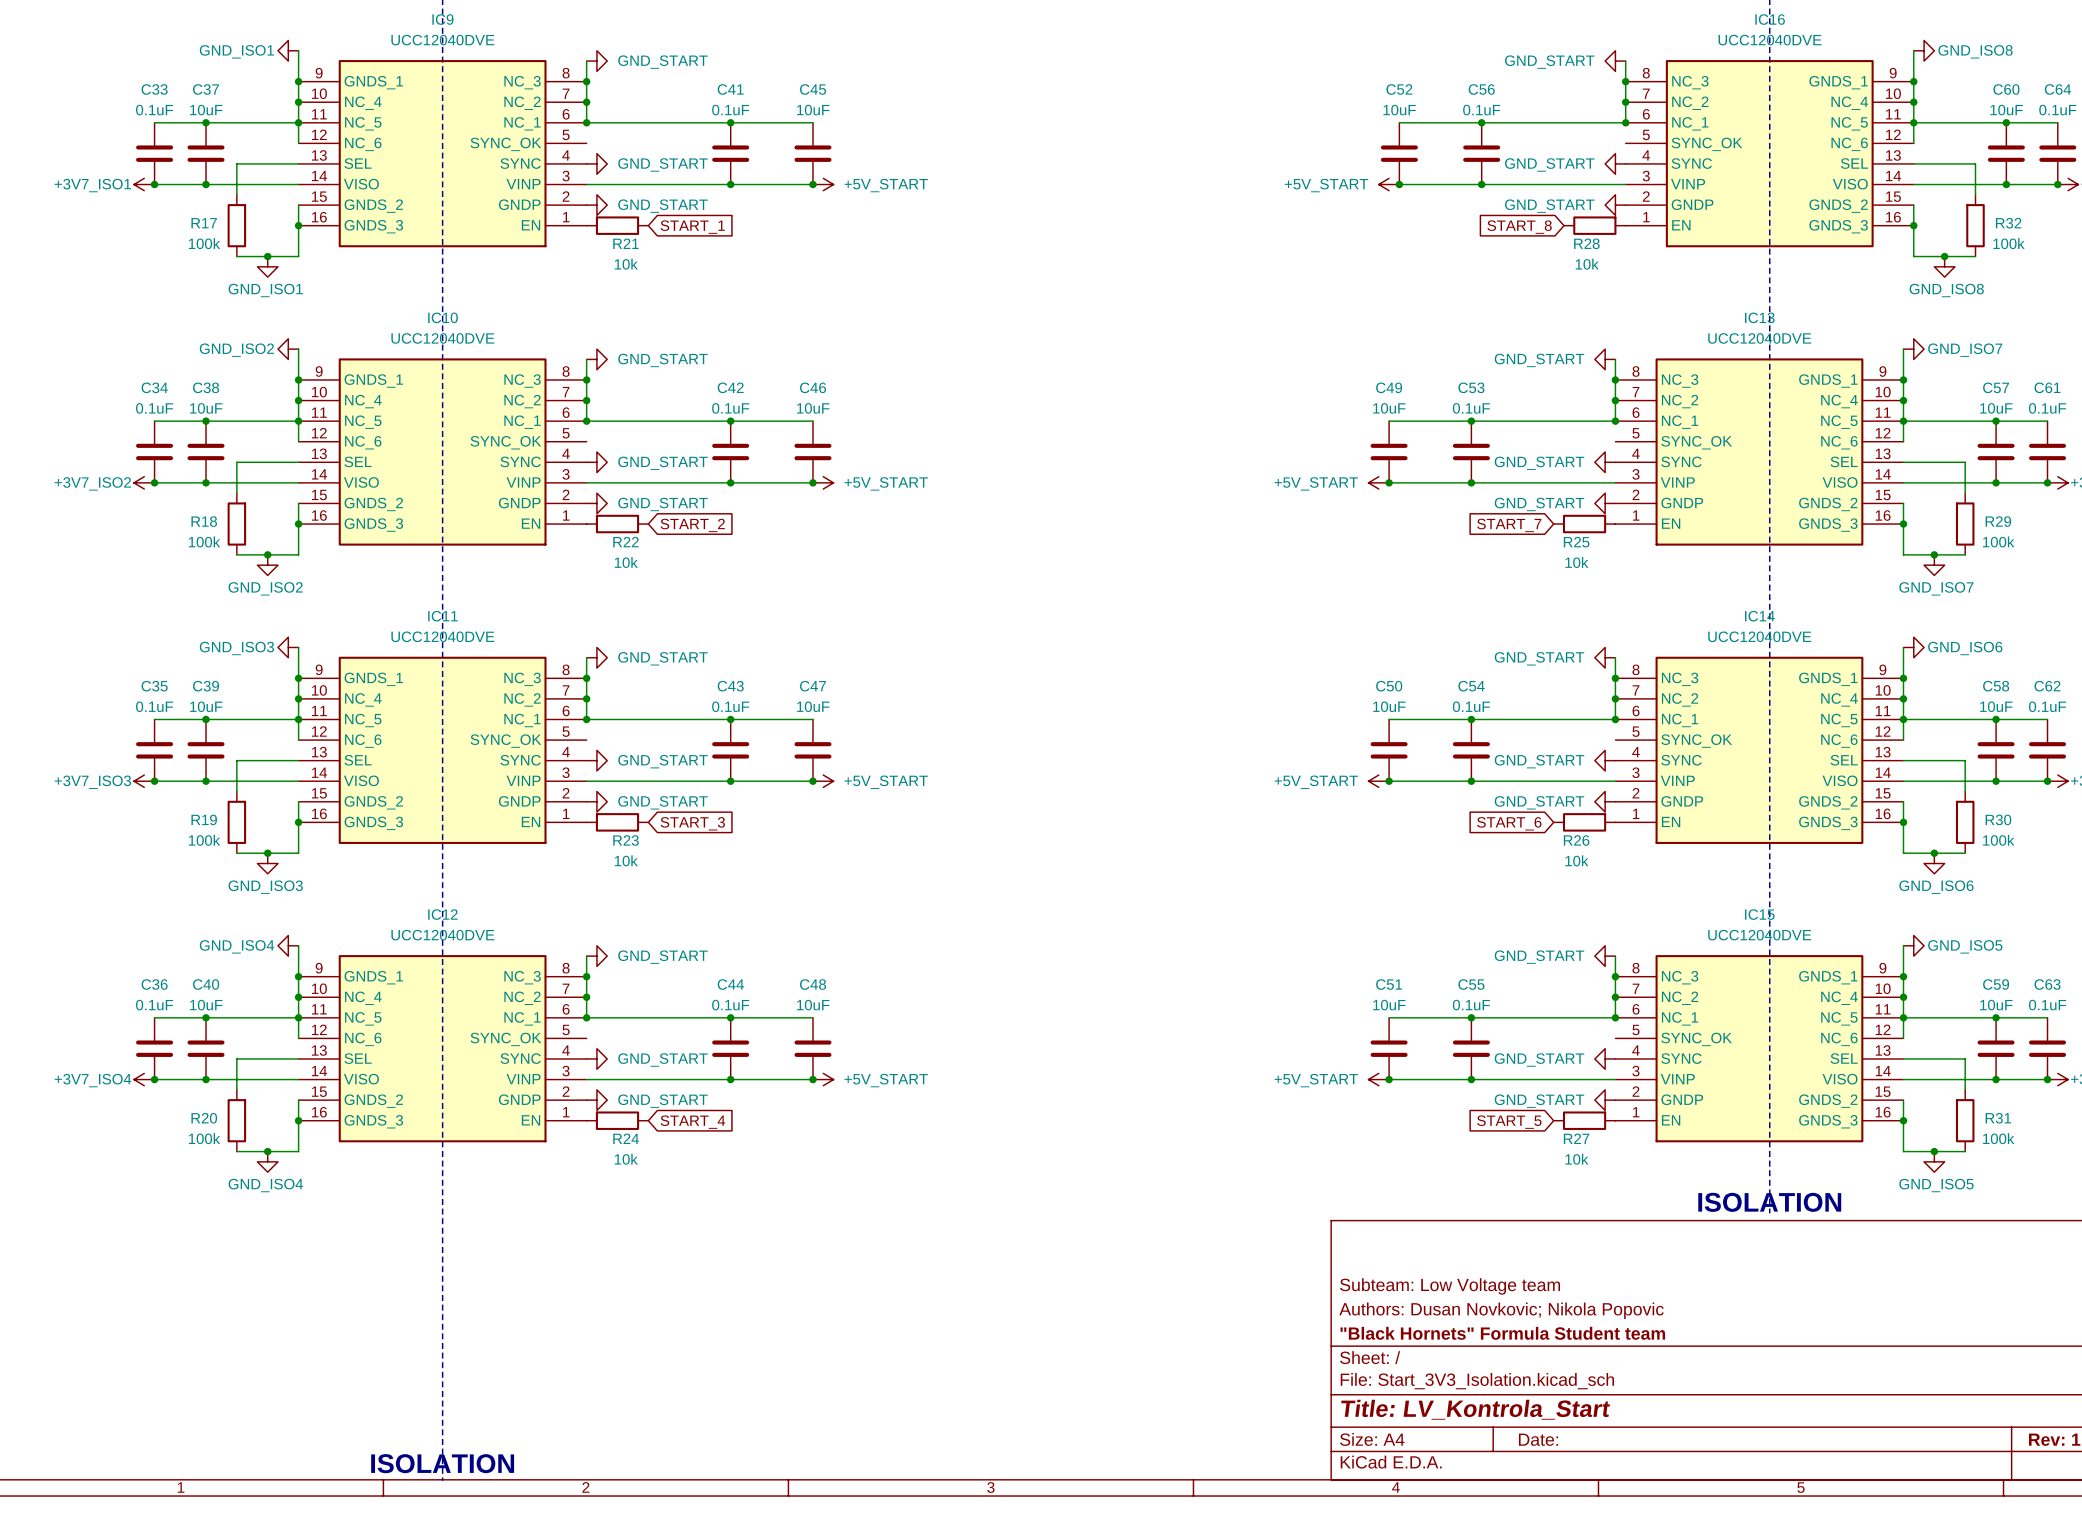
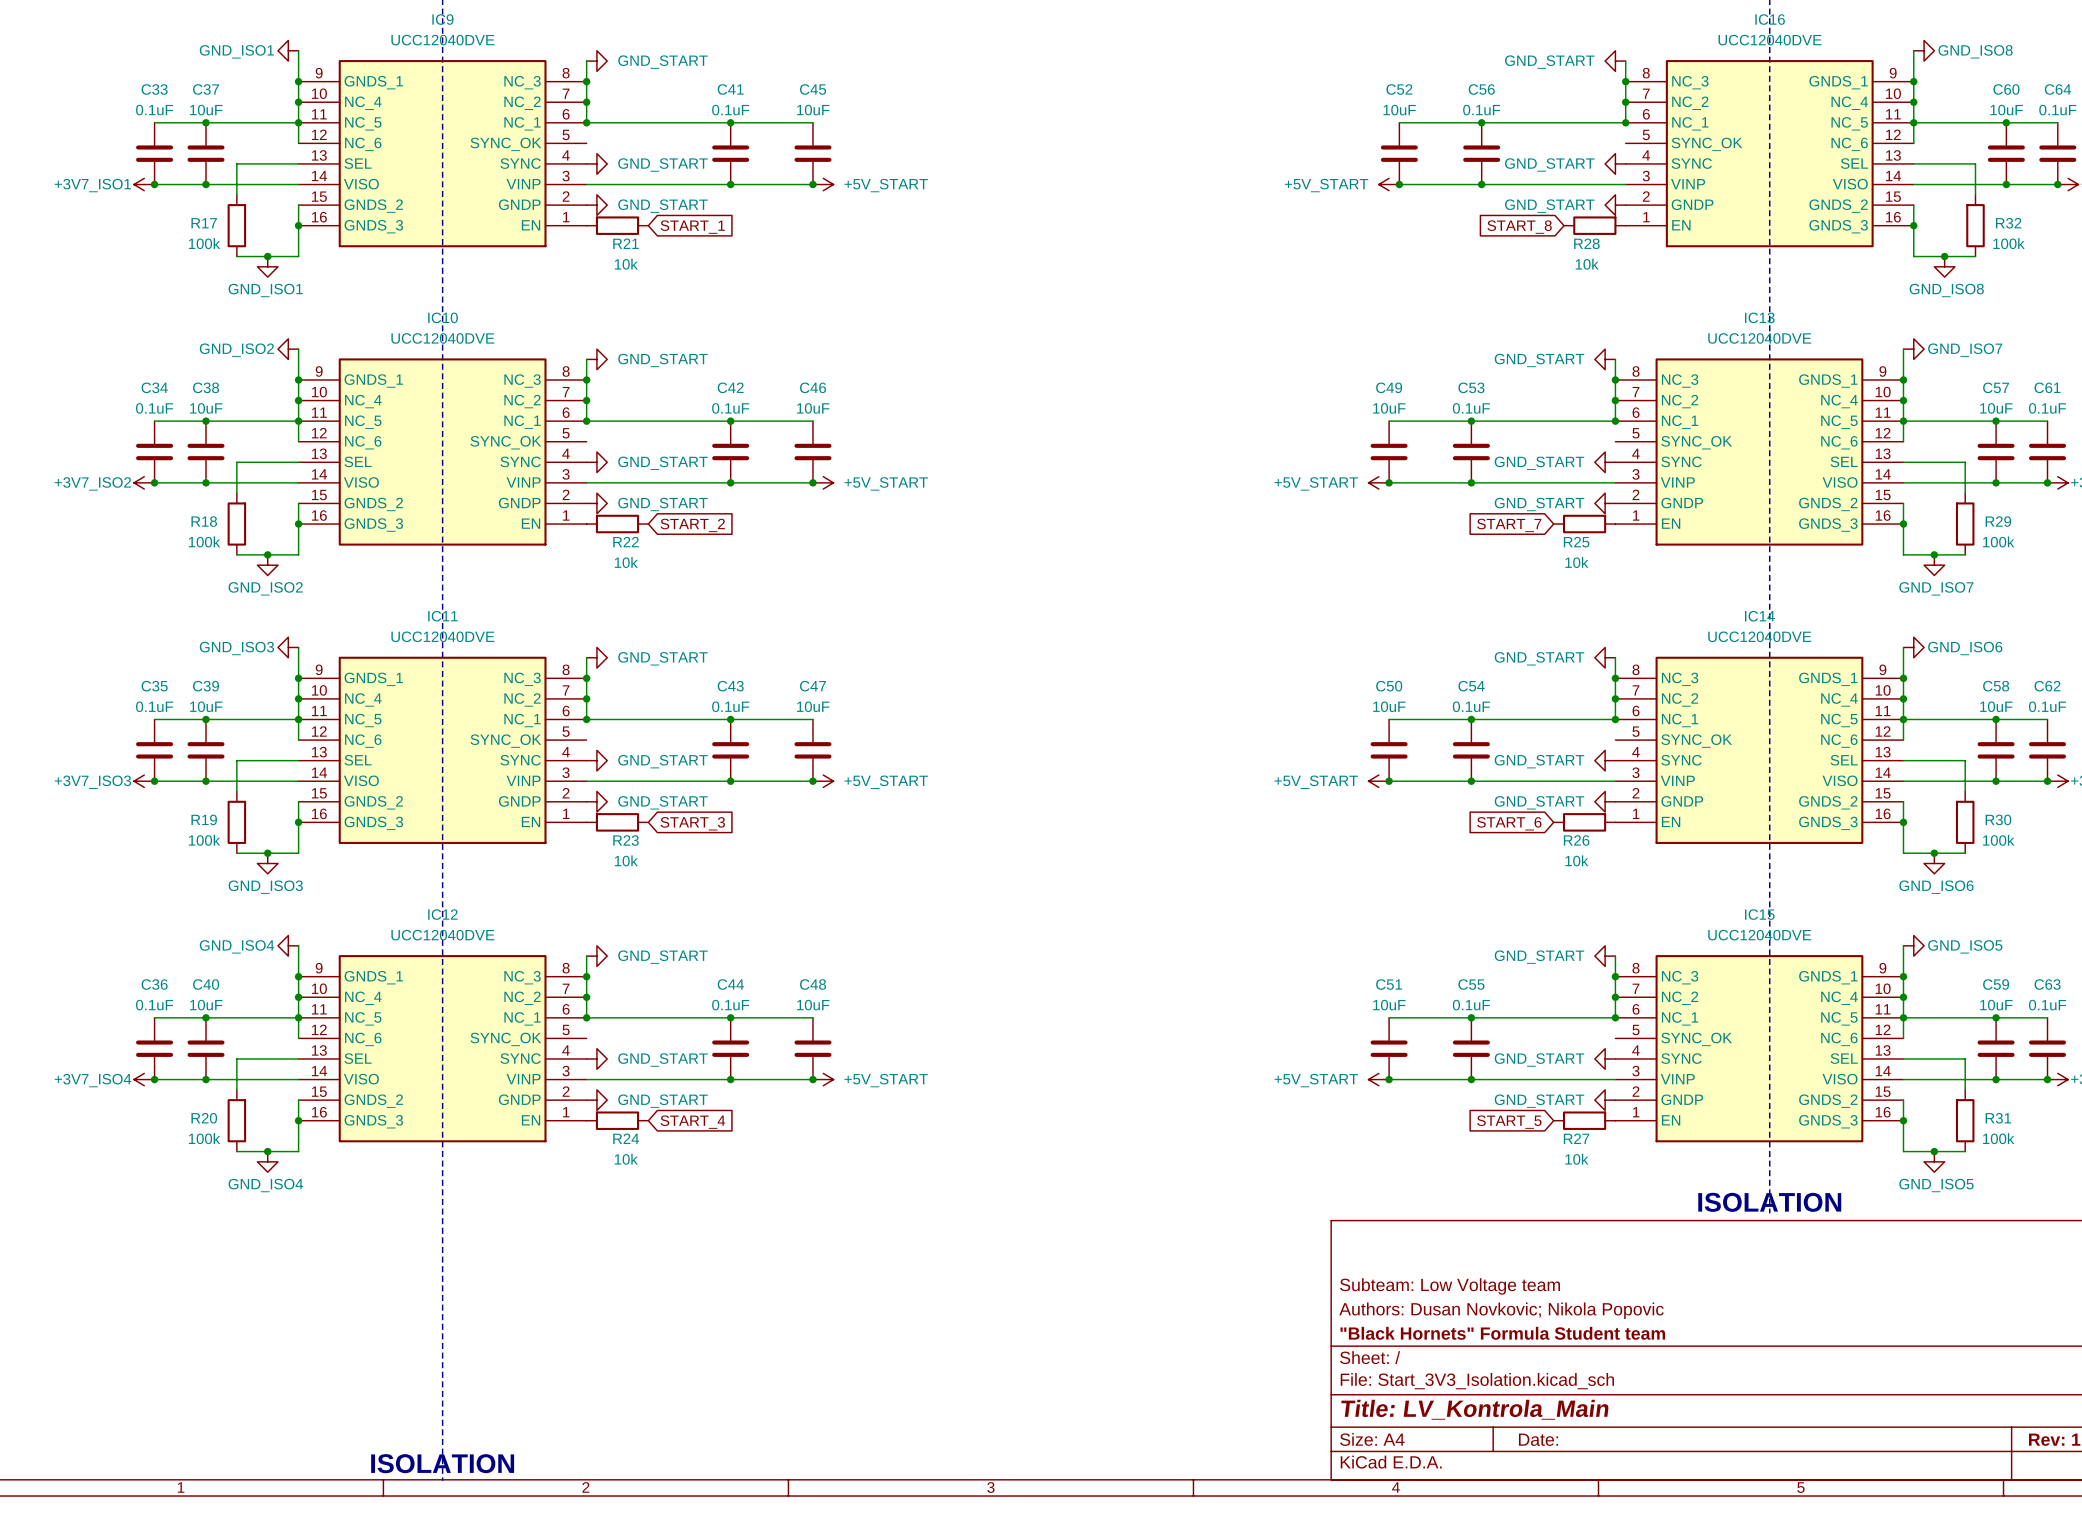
title block: Title: LV_Kontrola_Start (1475, 1409) -> Title: LV_Kontrola_Main (1474, 1409)

